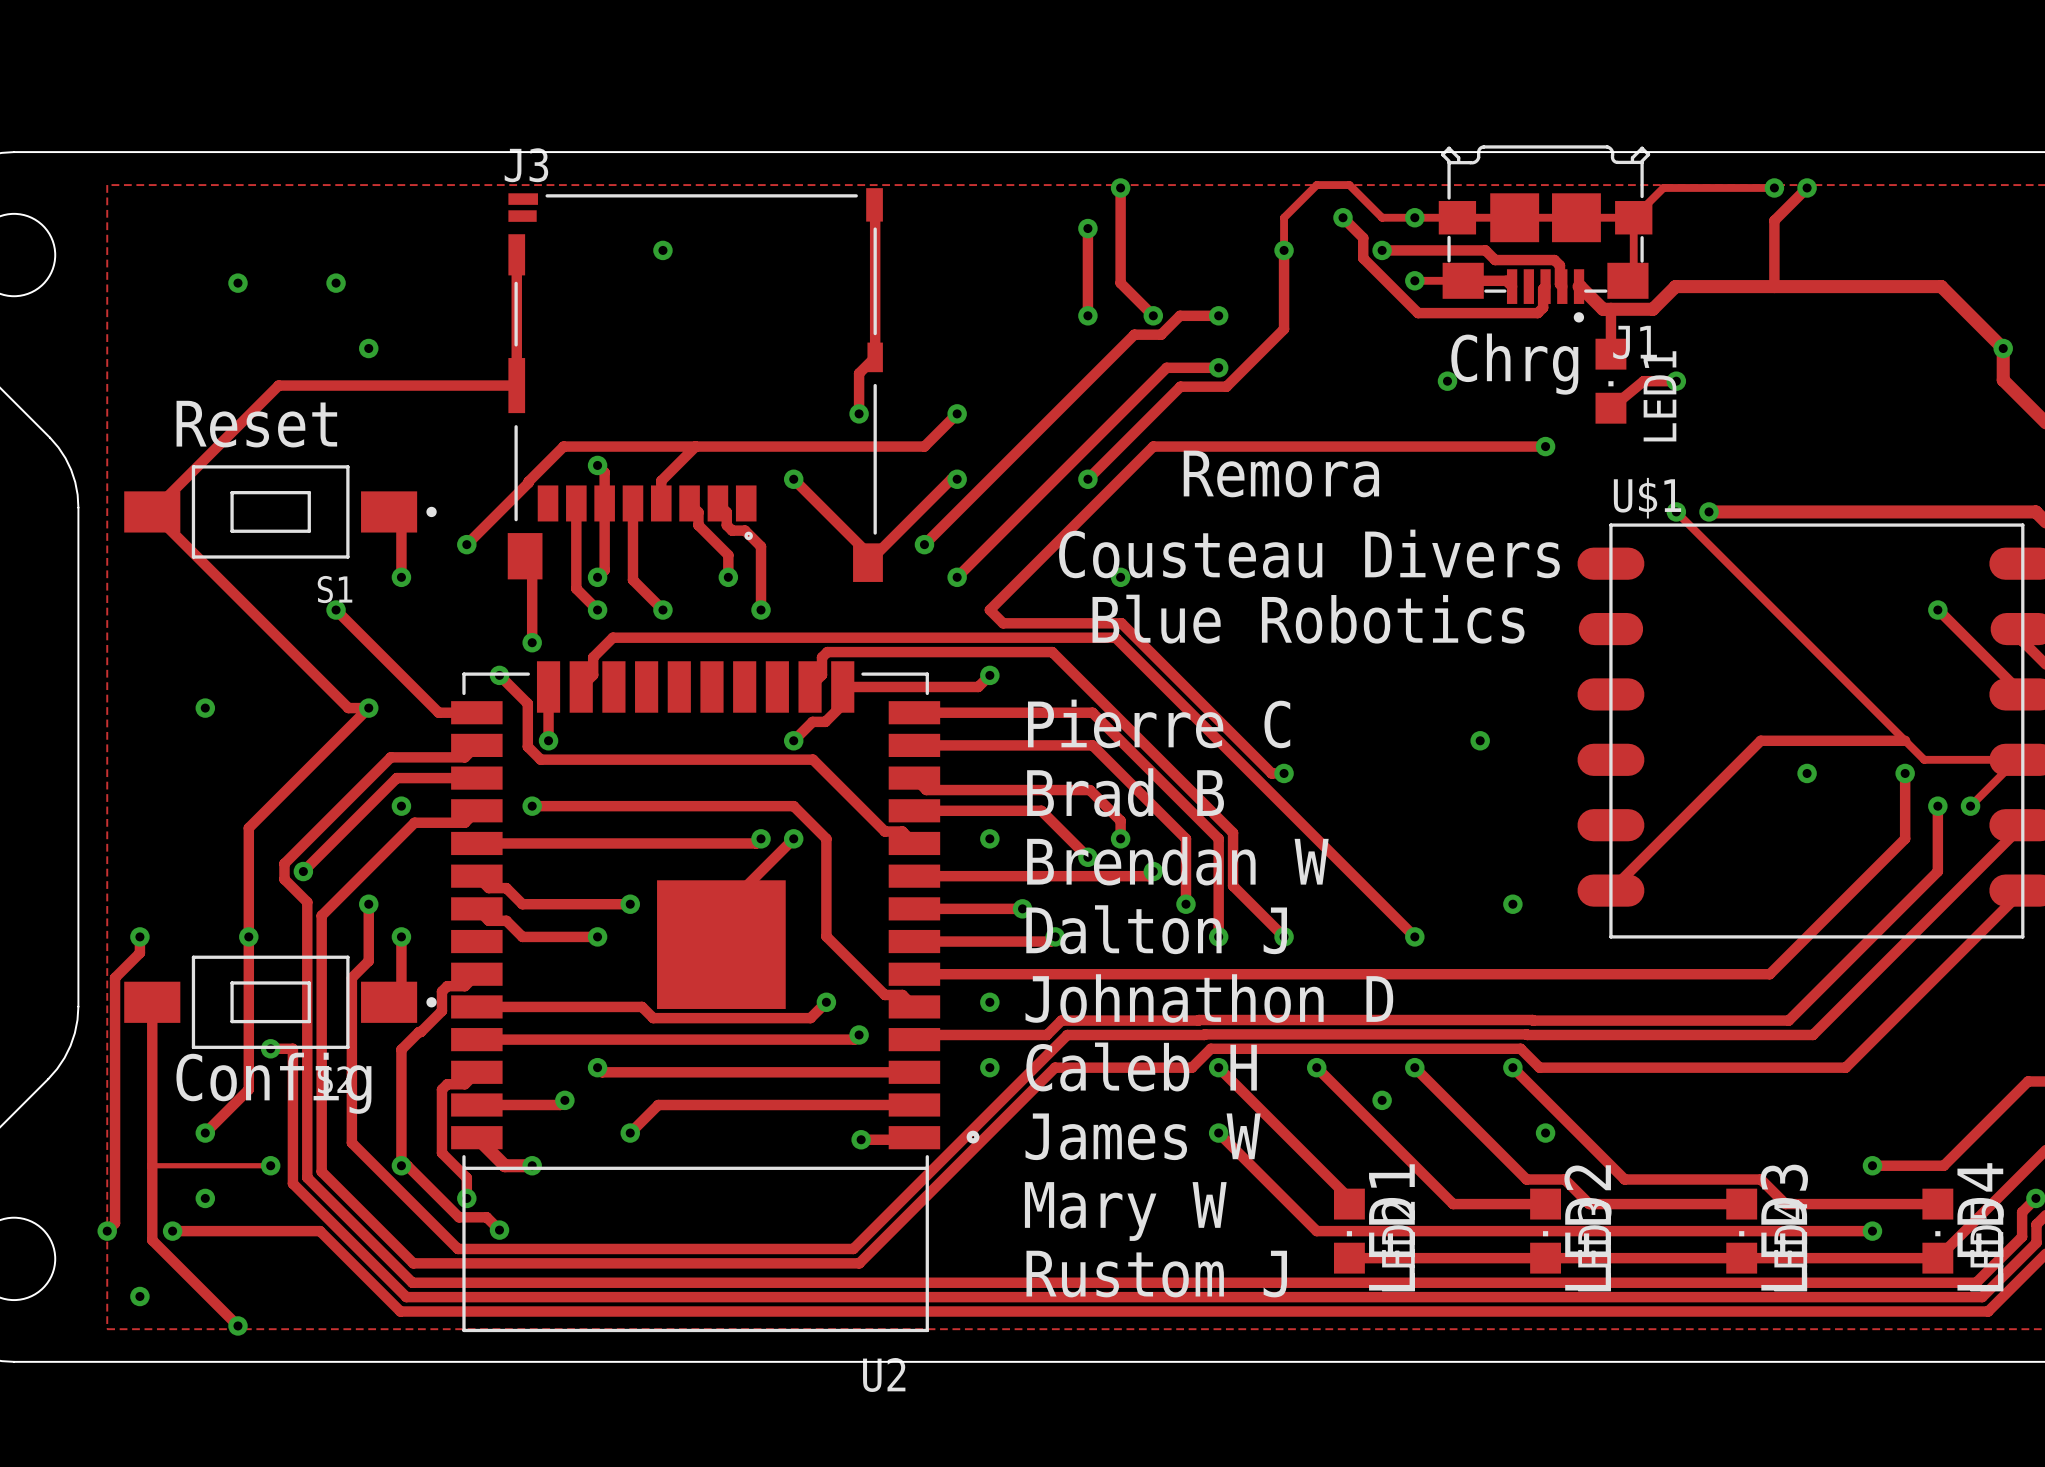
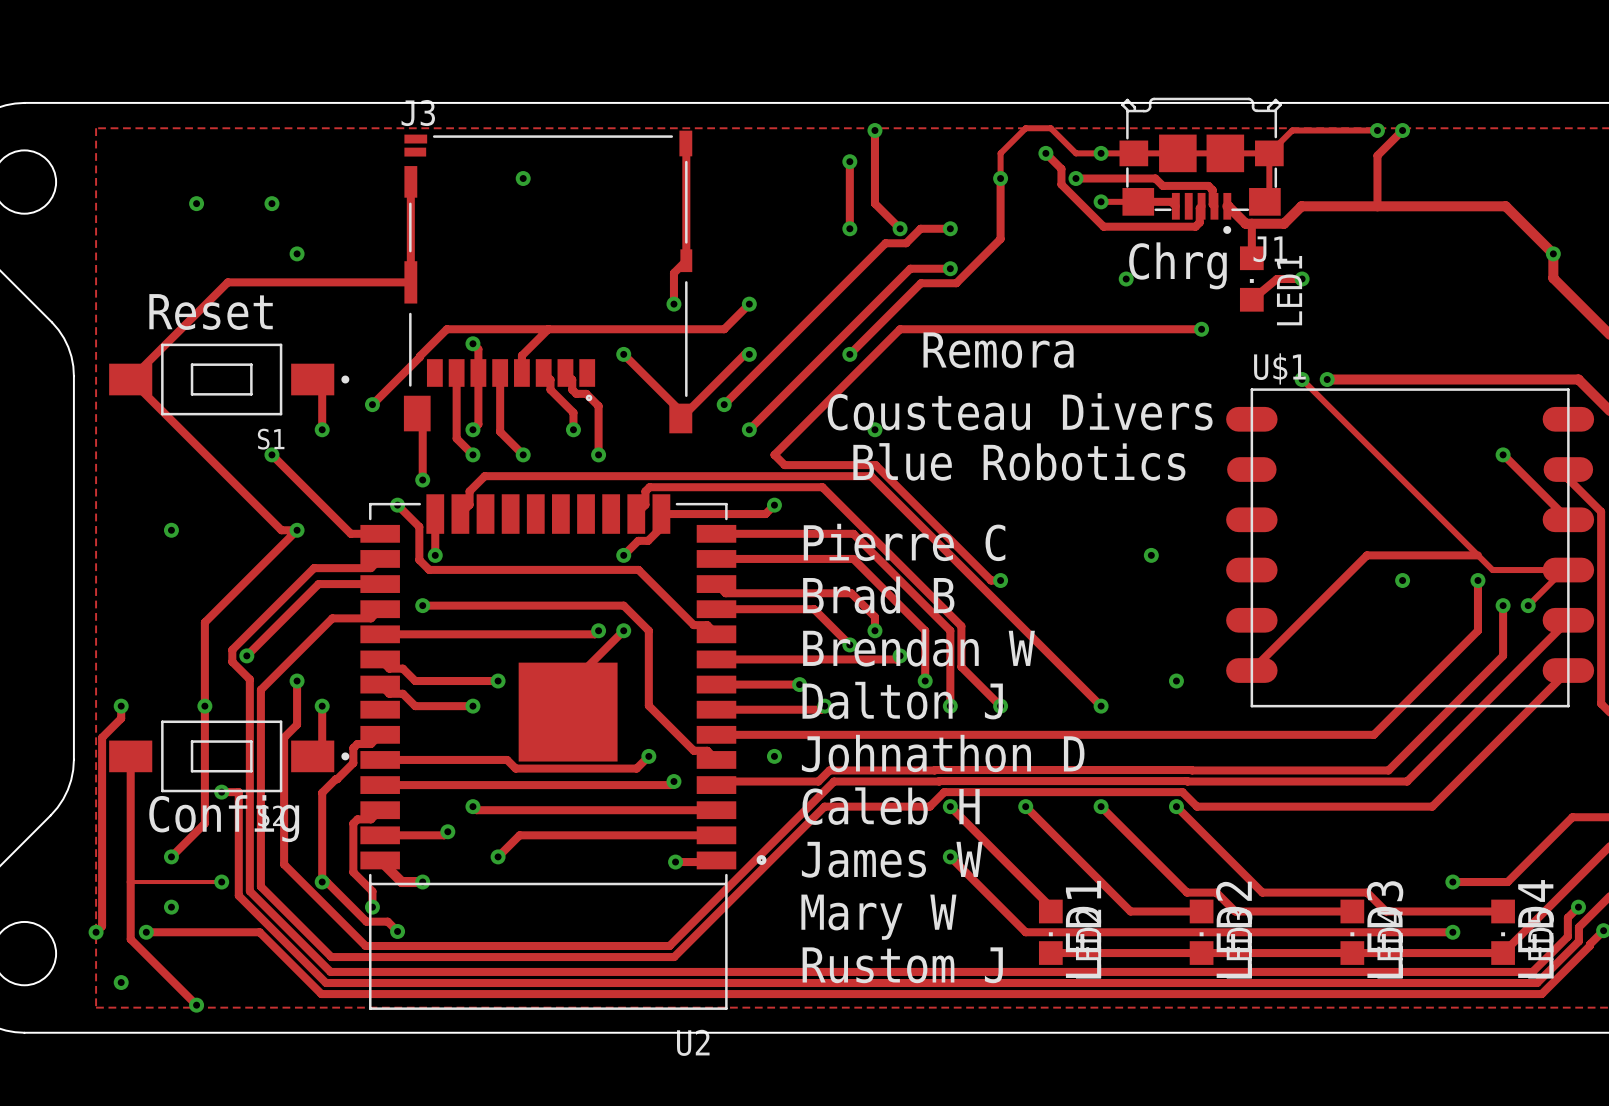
via: (401, 806) -> none
via: (989, 838) -> none
via: (989, 1067) -> none
via: (1382, 1100) -> none
via: (1545, 1133) -> none

